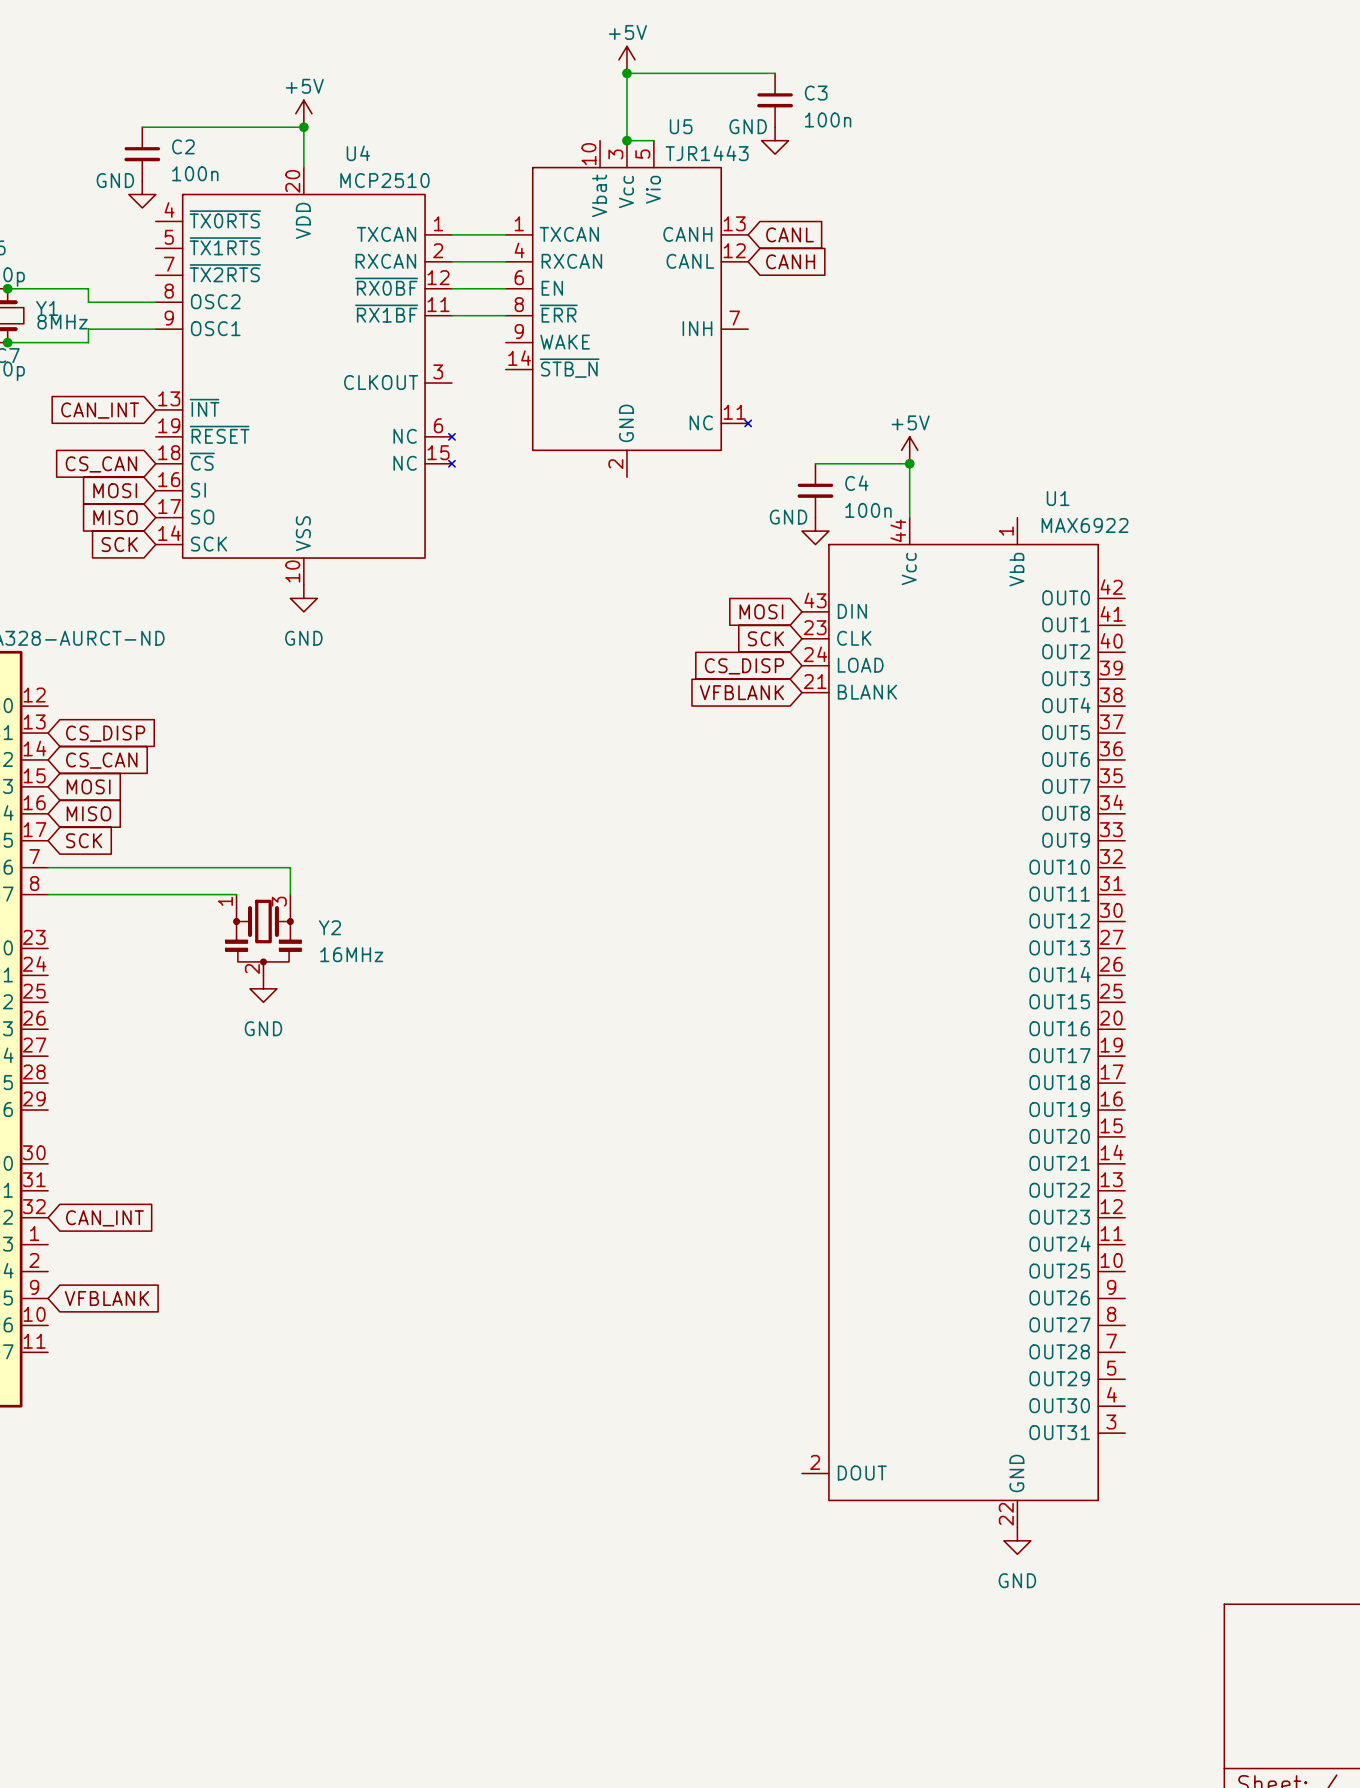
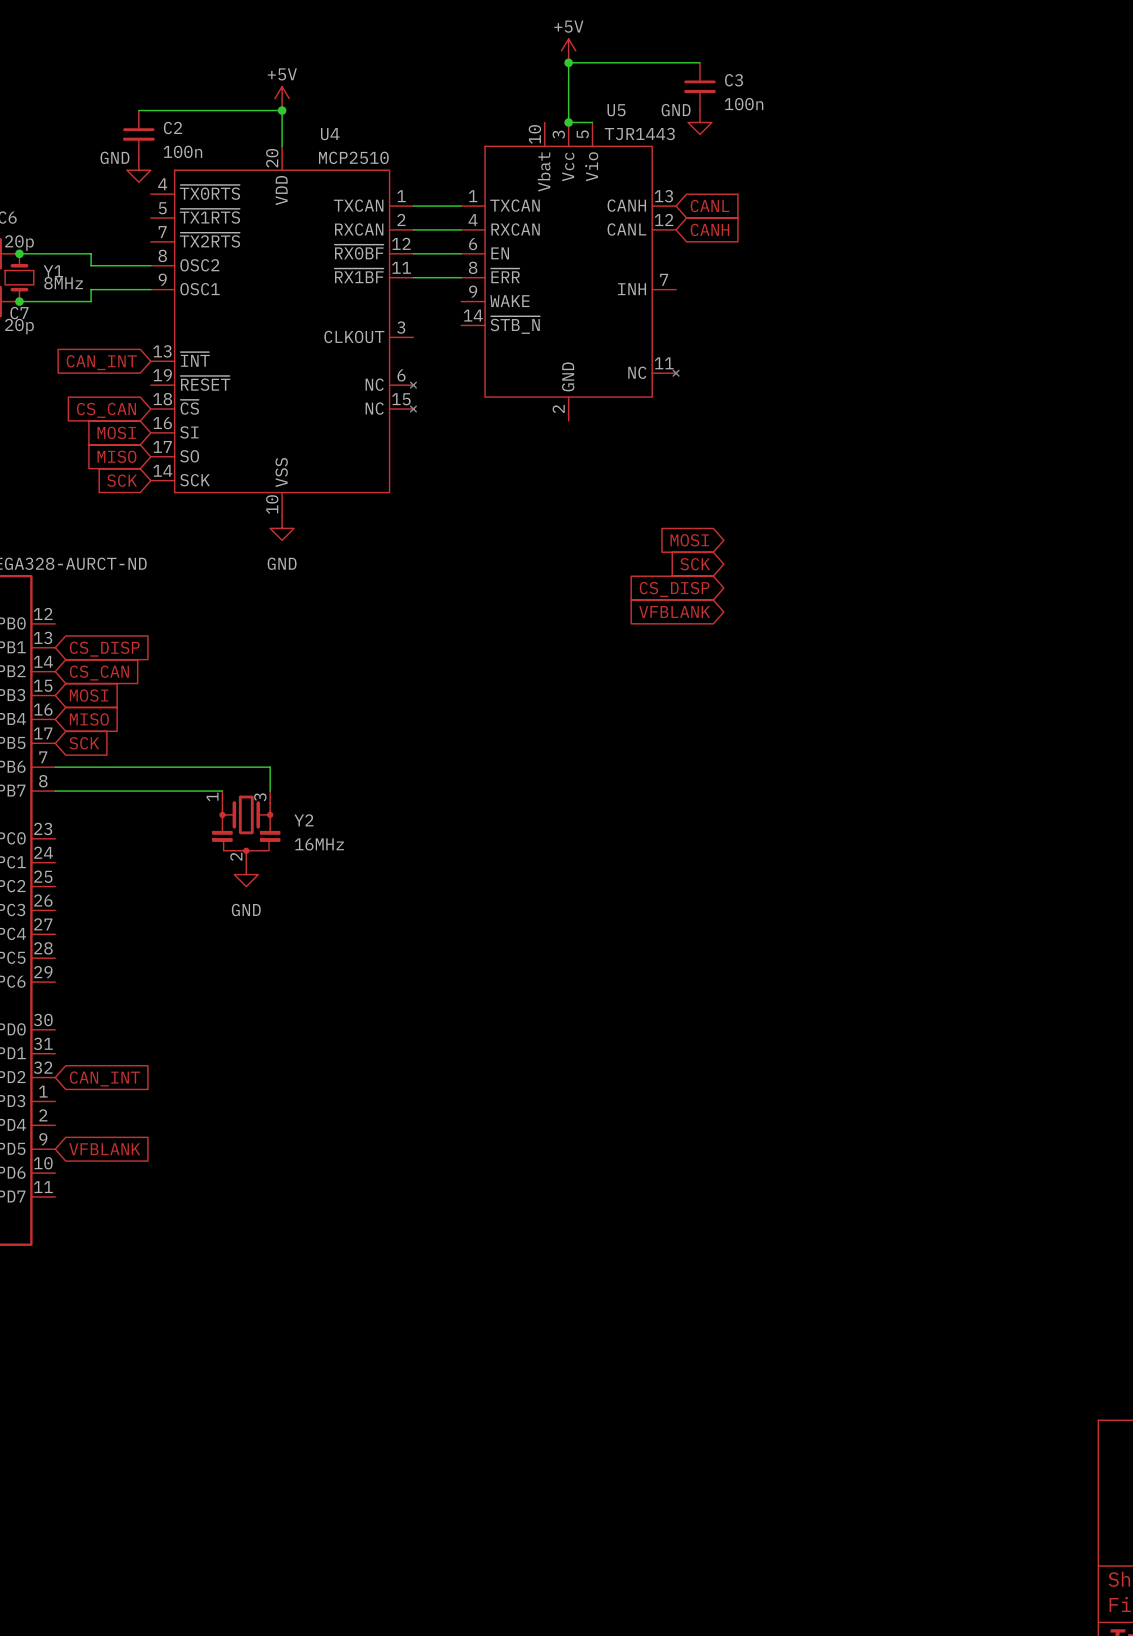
power symbol: +5V (909, 450) -> none
wire: (815, 463) (909, 463) (909, 517) -> none
junction: (909, 463) -> none
C4: 100n (815, 490) -> none
power symbol: GND (815, 531) -> none
U1: MAX6922 (963, 1022) -> none
power symbol: GND (1017, 1540) -> none

